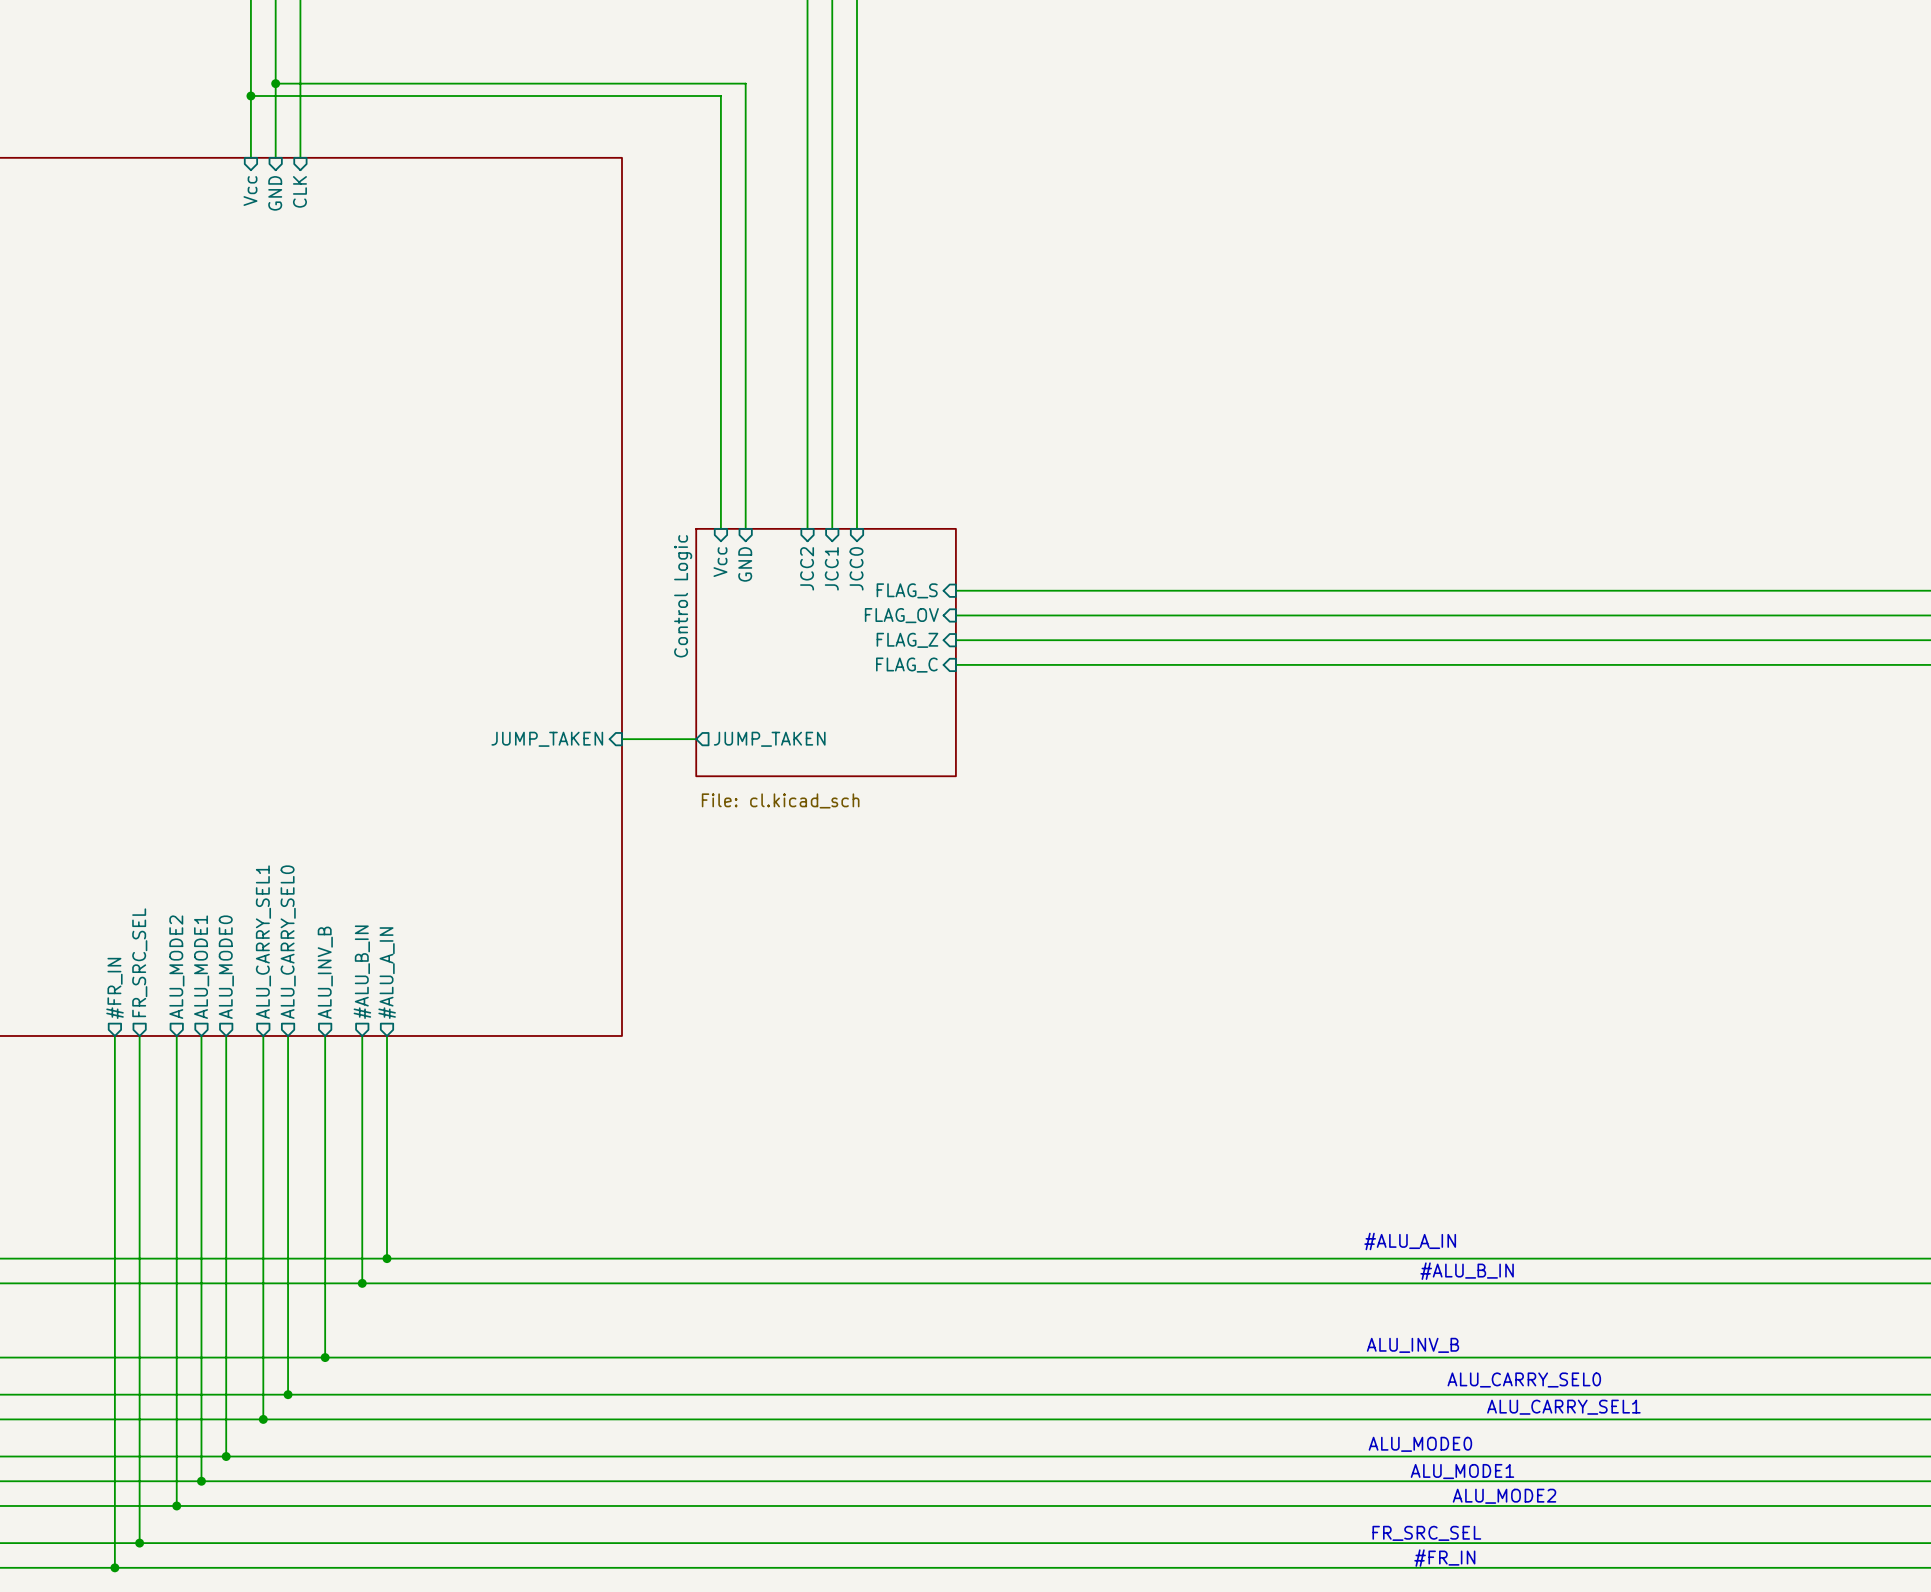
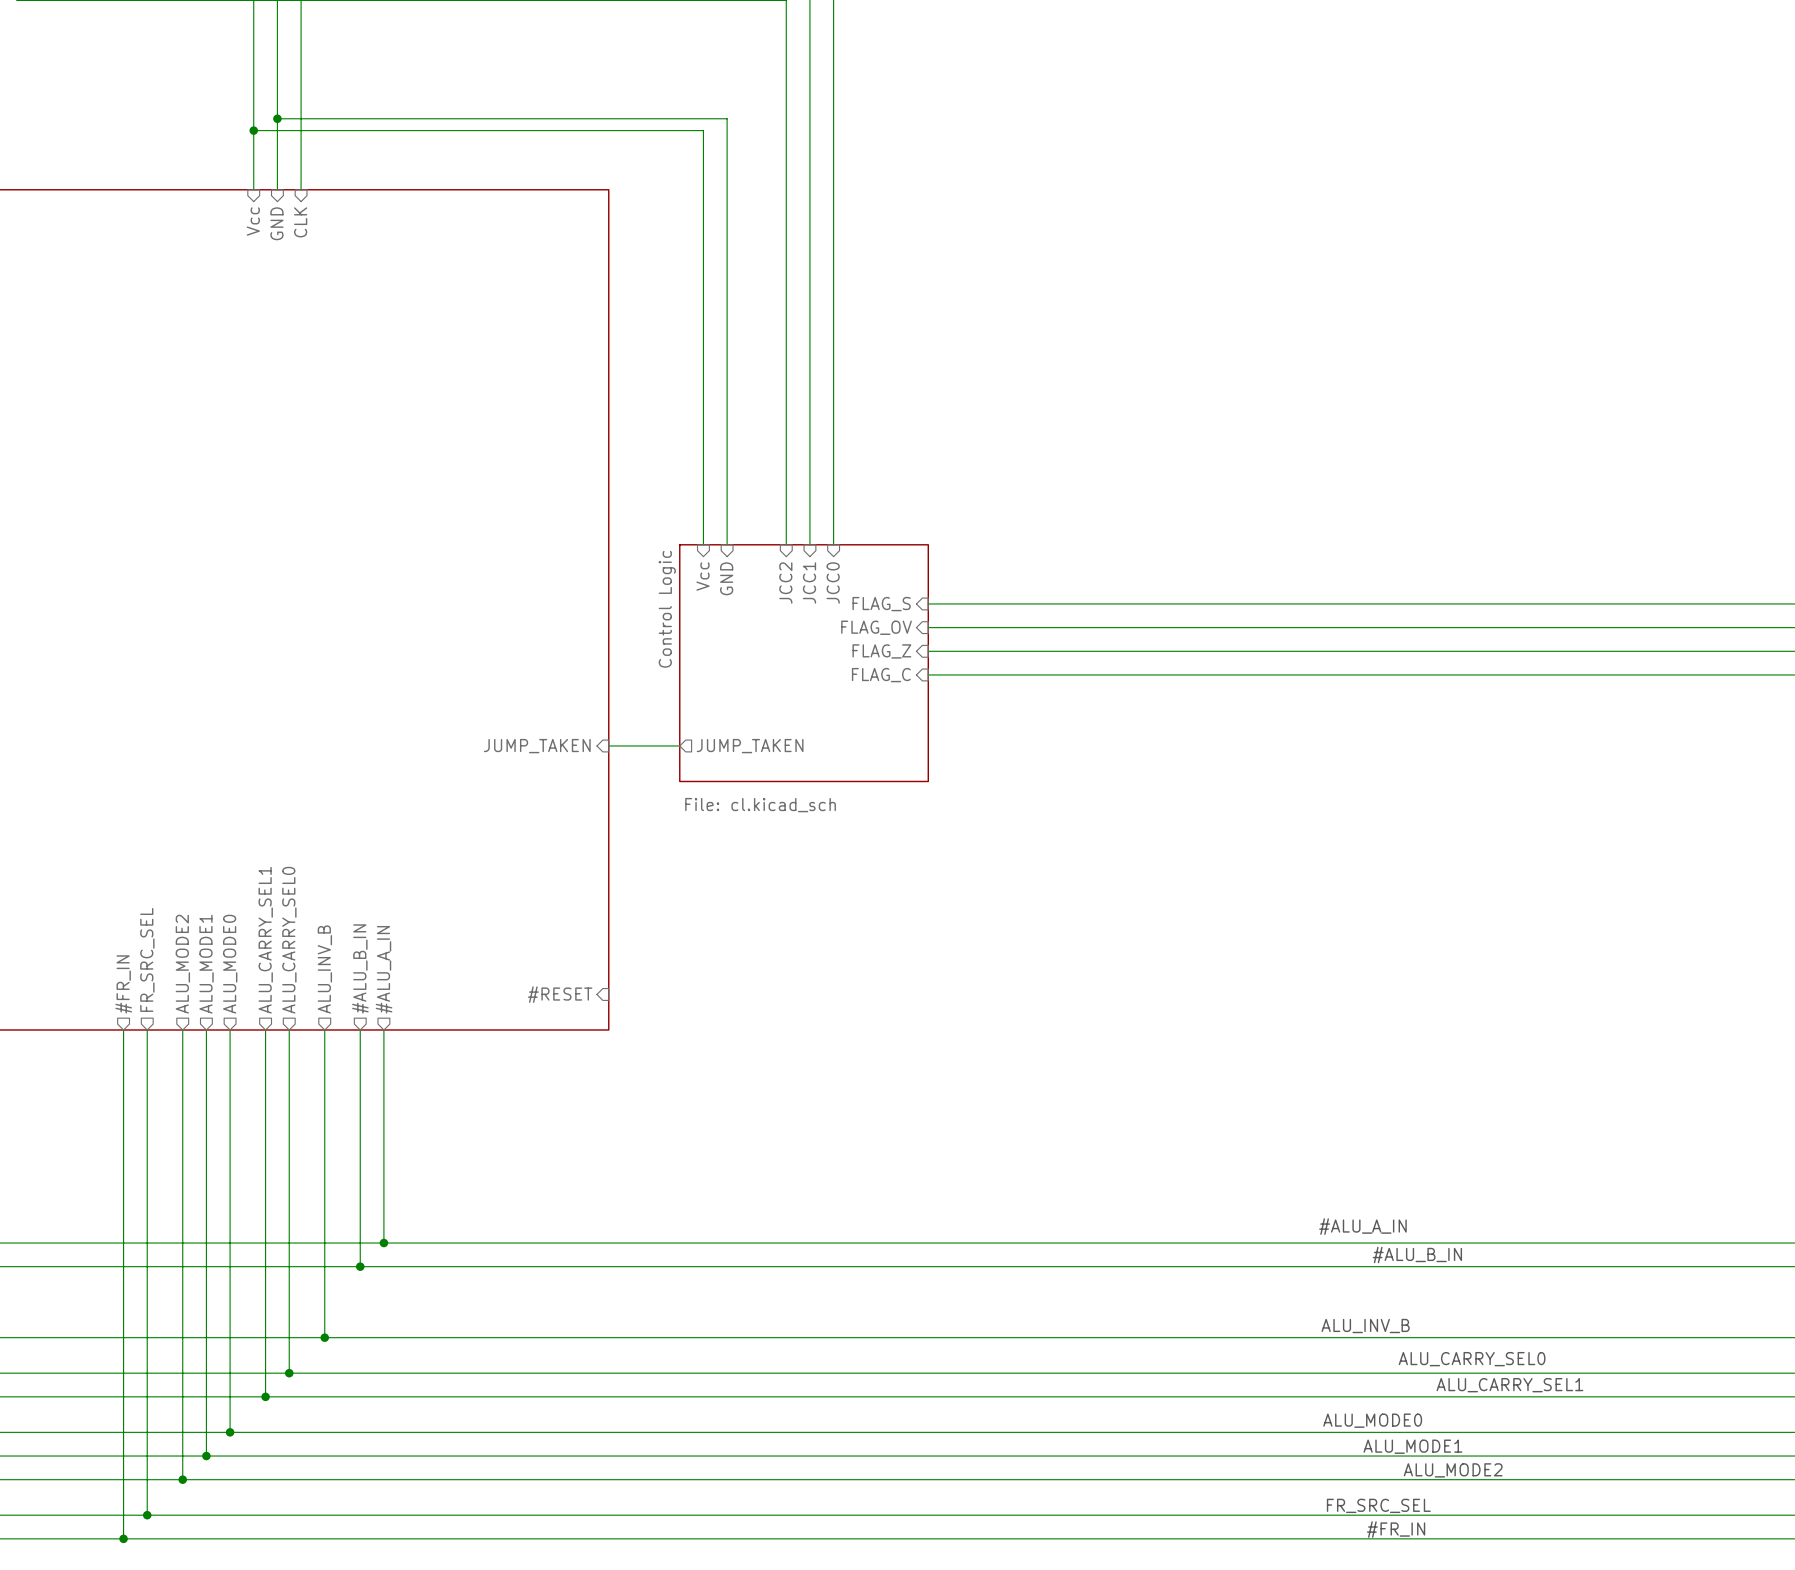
sheet pin: none -> #RESET (560, 994)

